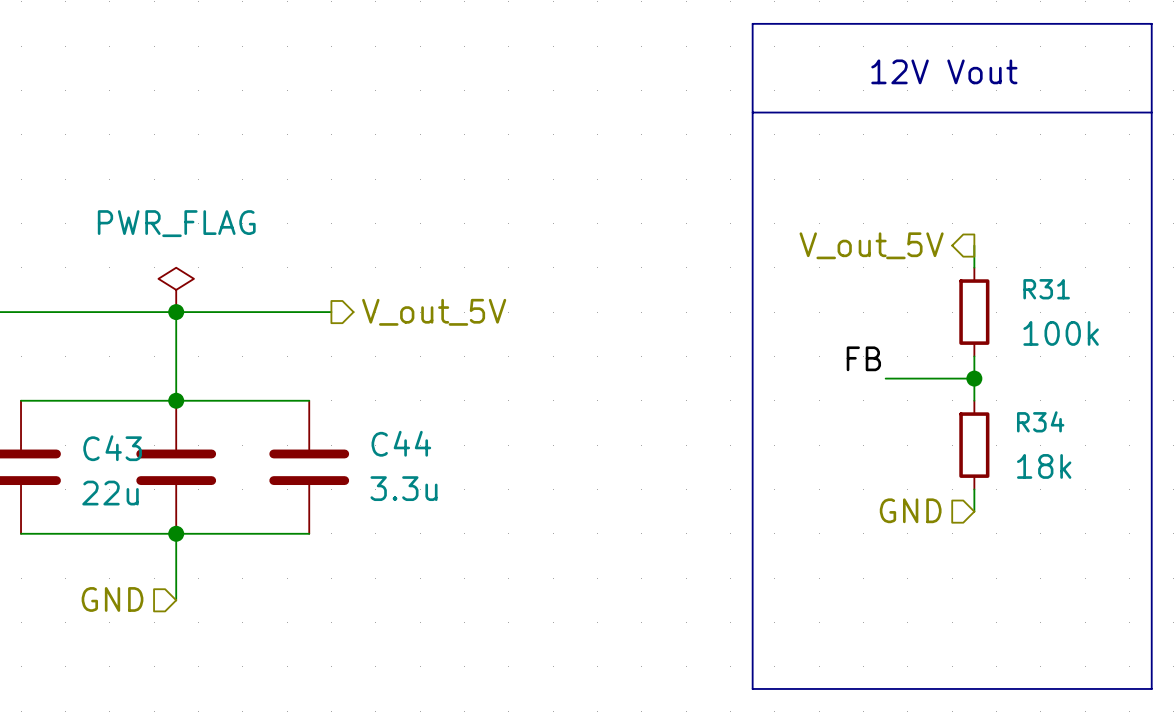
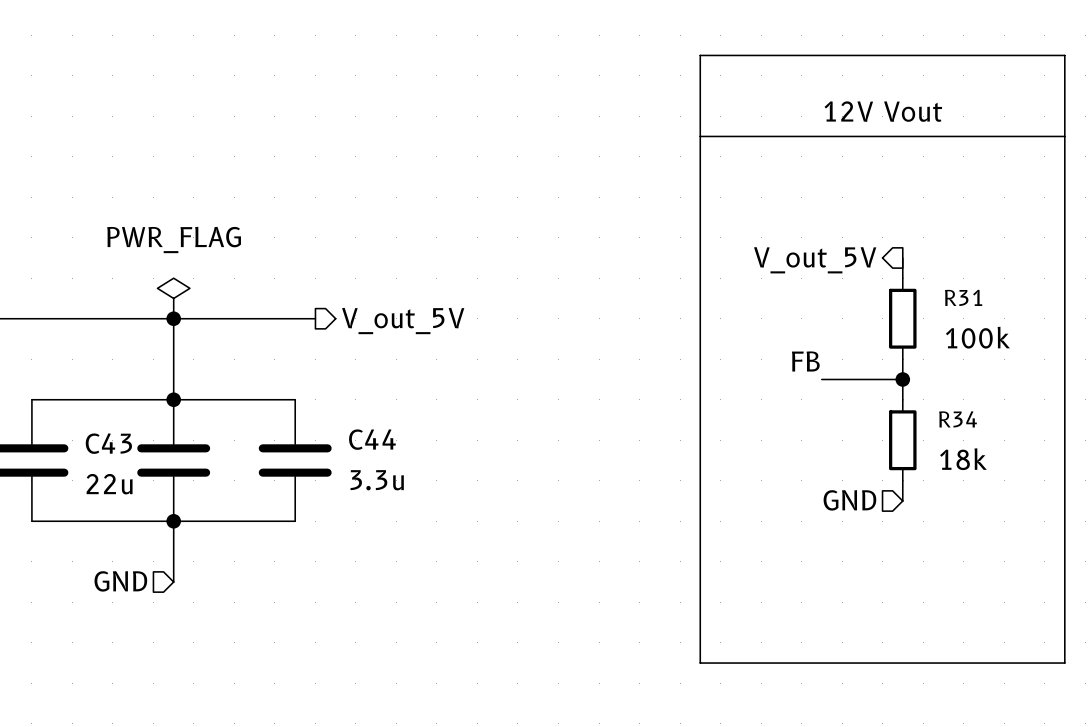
text position: 12V Vout (944, 71) -> 12V Vout (883, 111)

